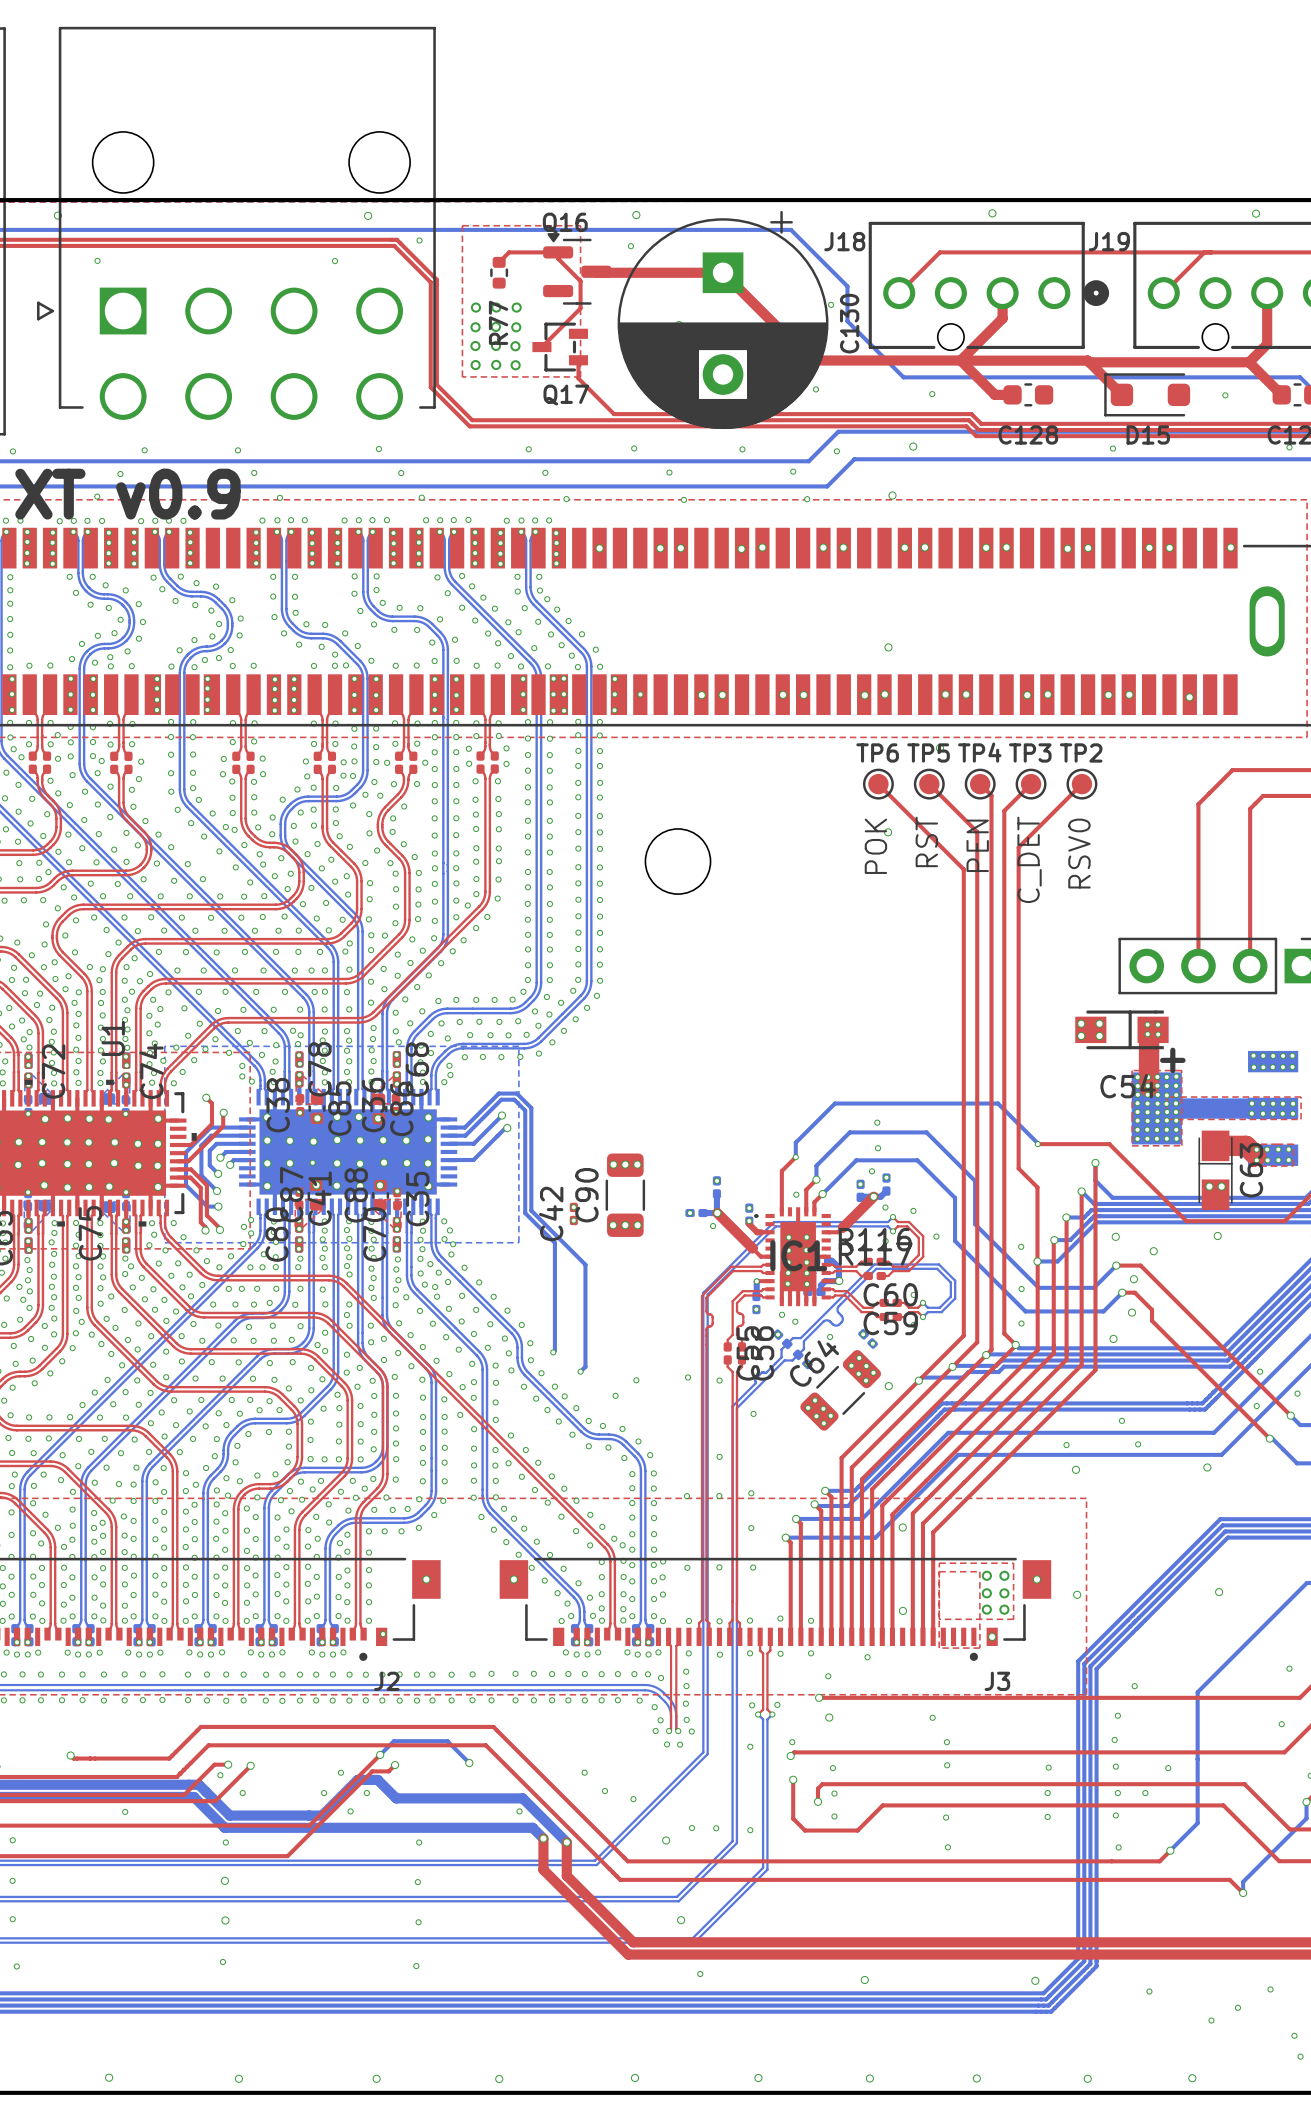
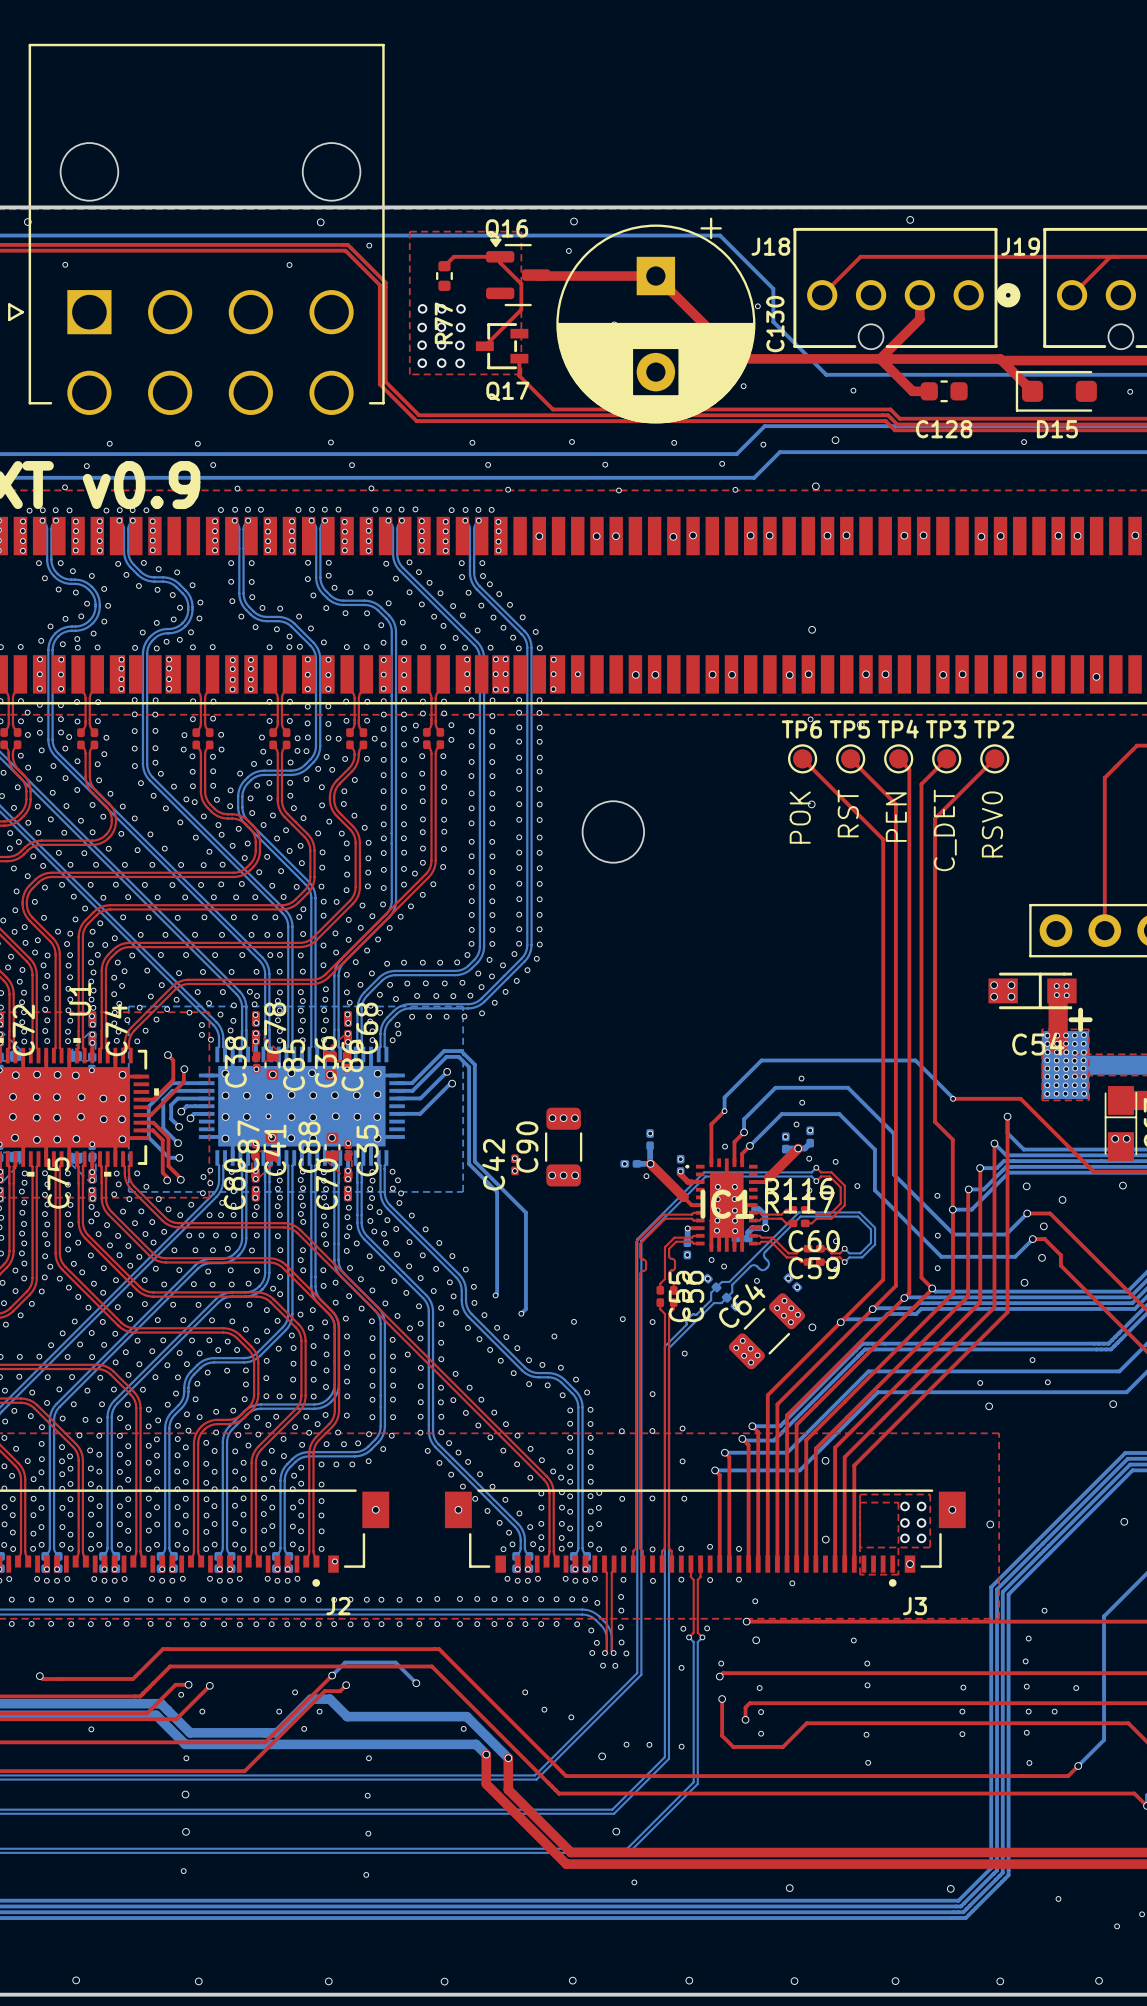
via: none -> (810, 719)

